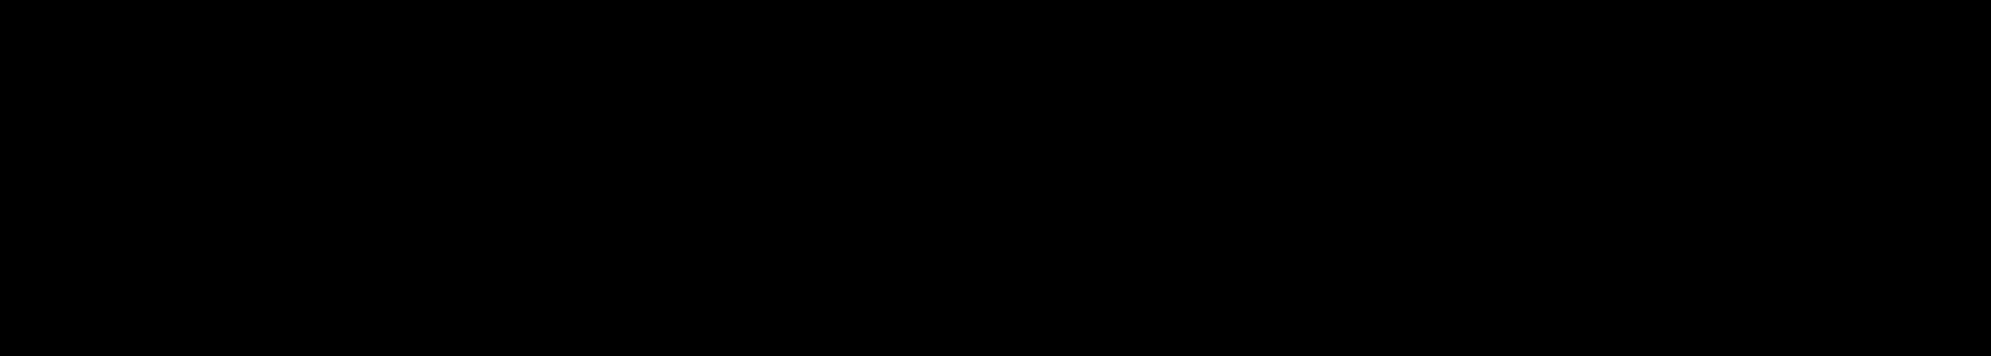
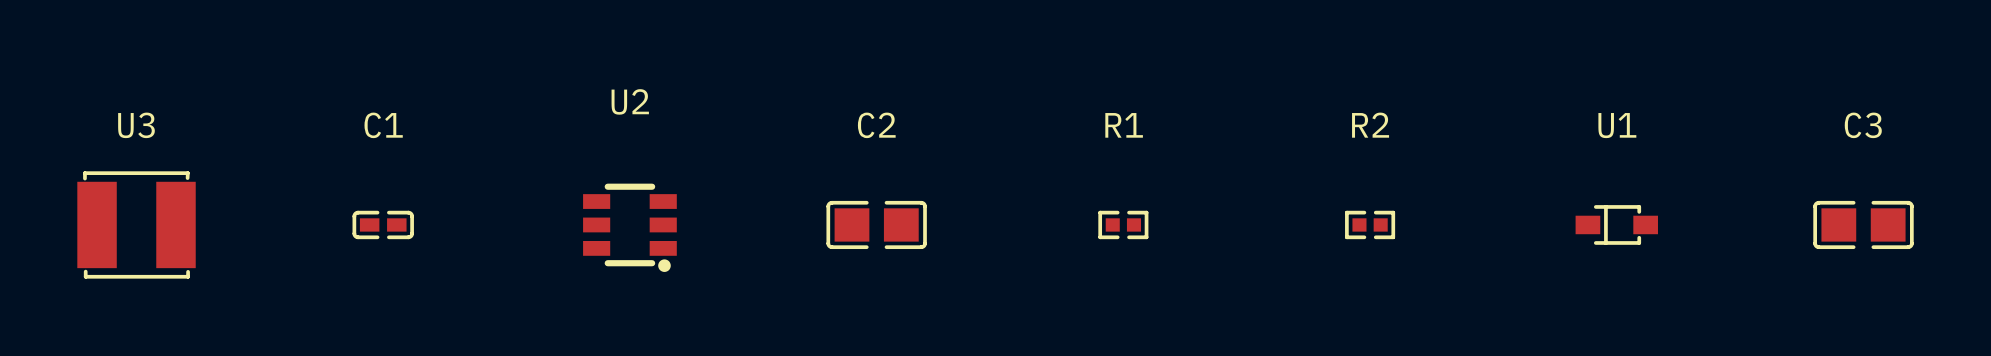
U3: none -> (136, 224)
C1: none -> (383, 224)
C2: none -> (876, 224)
R1: none -> (1123, 224)
R2: none -> (1370, 224)
U1: none -> (1616, 224)
C3: none -> (1863, 224)
U2: none -> (629, 227)

